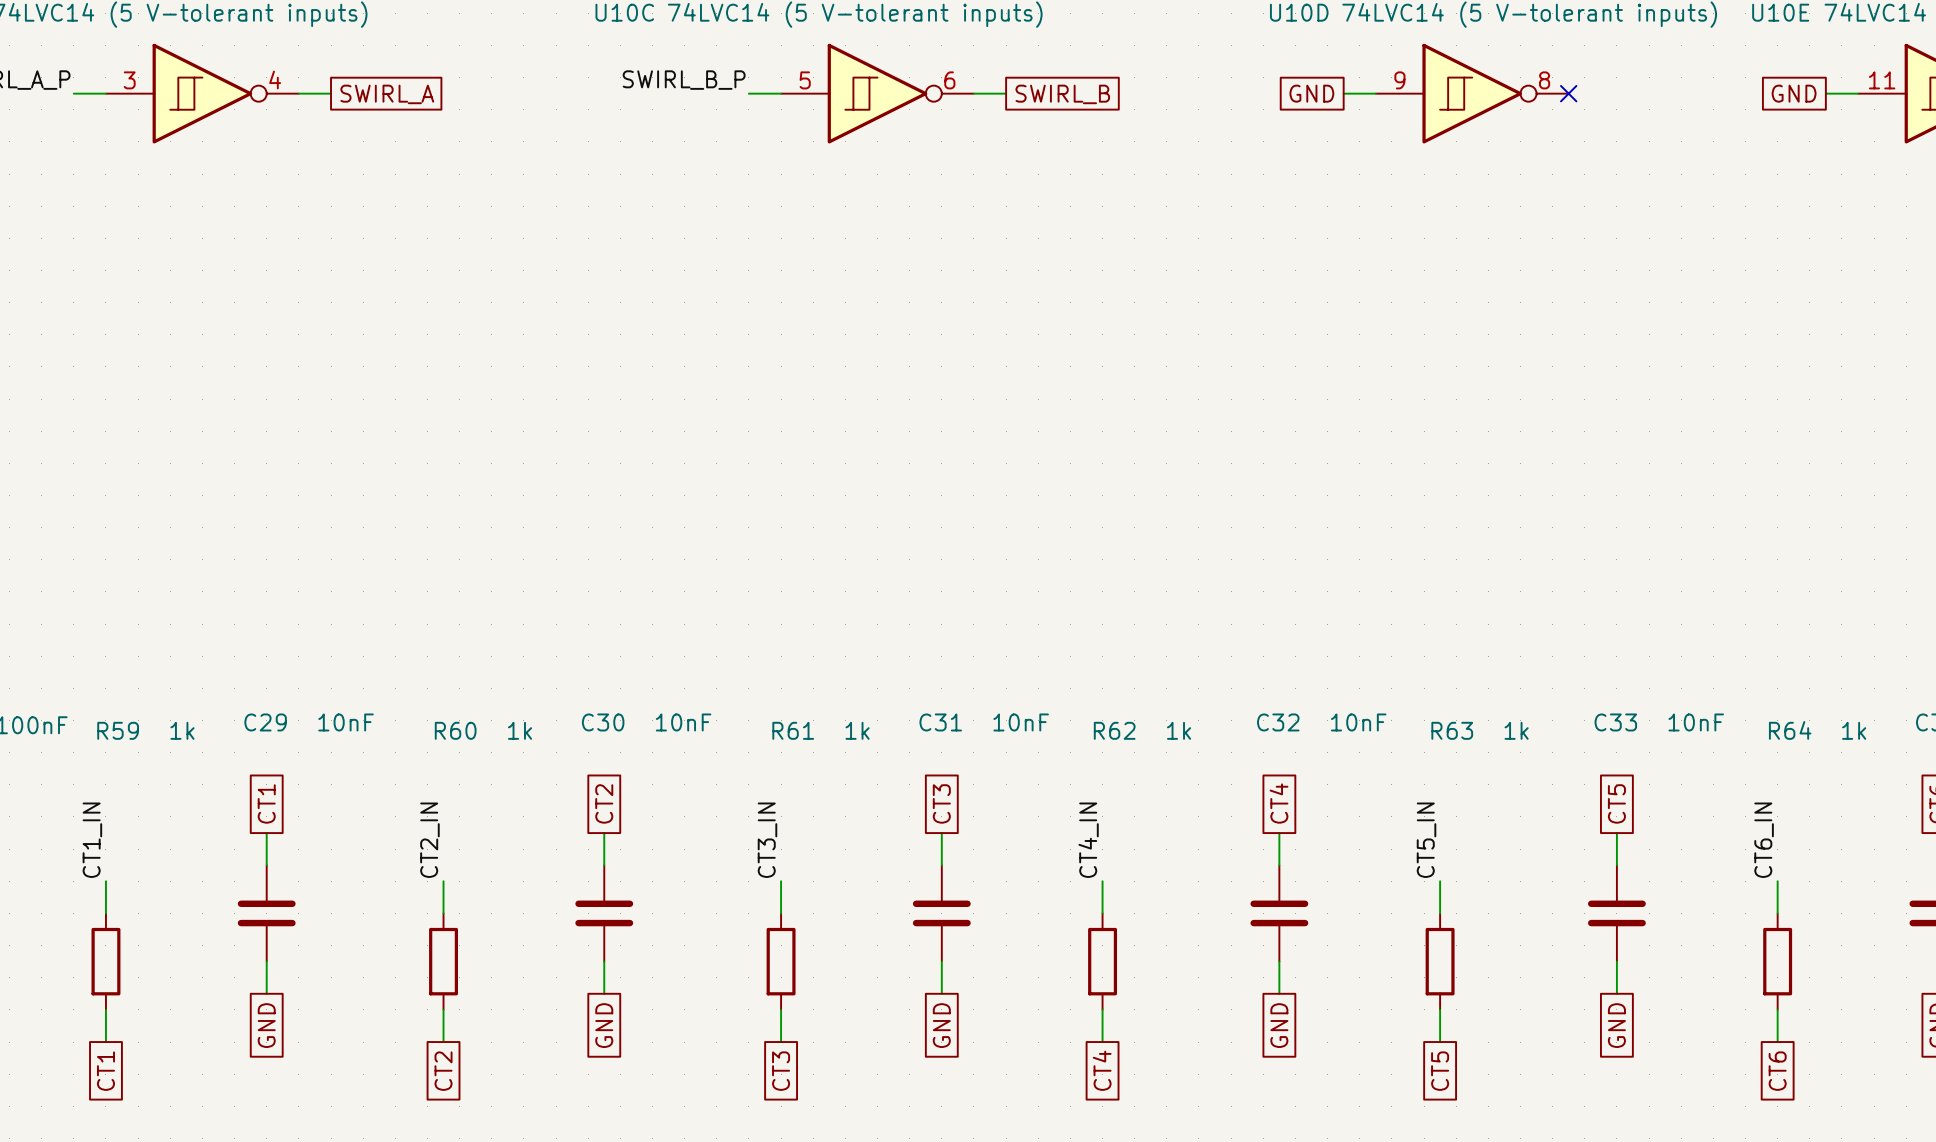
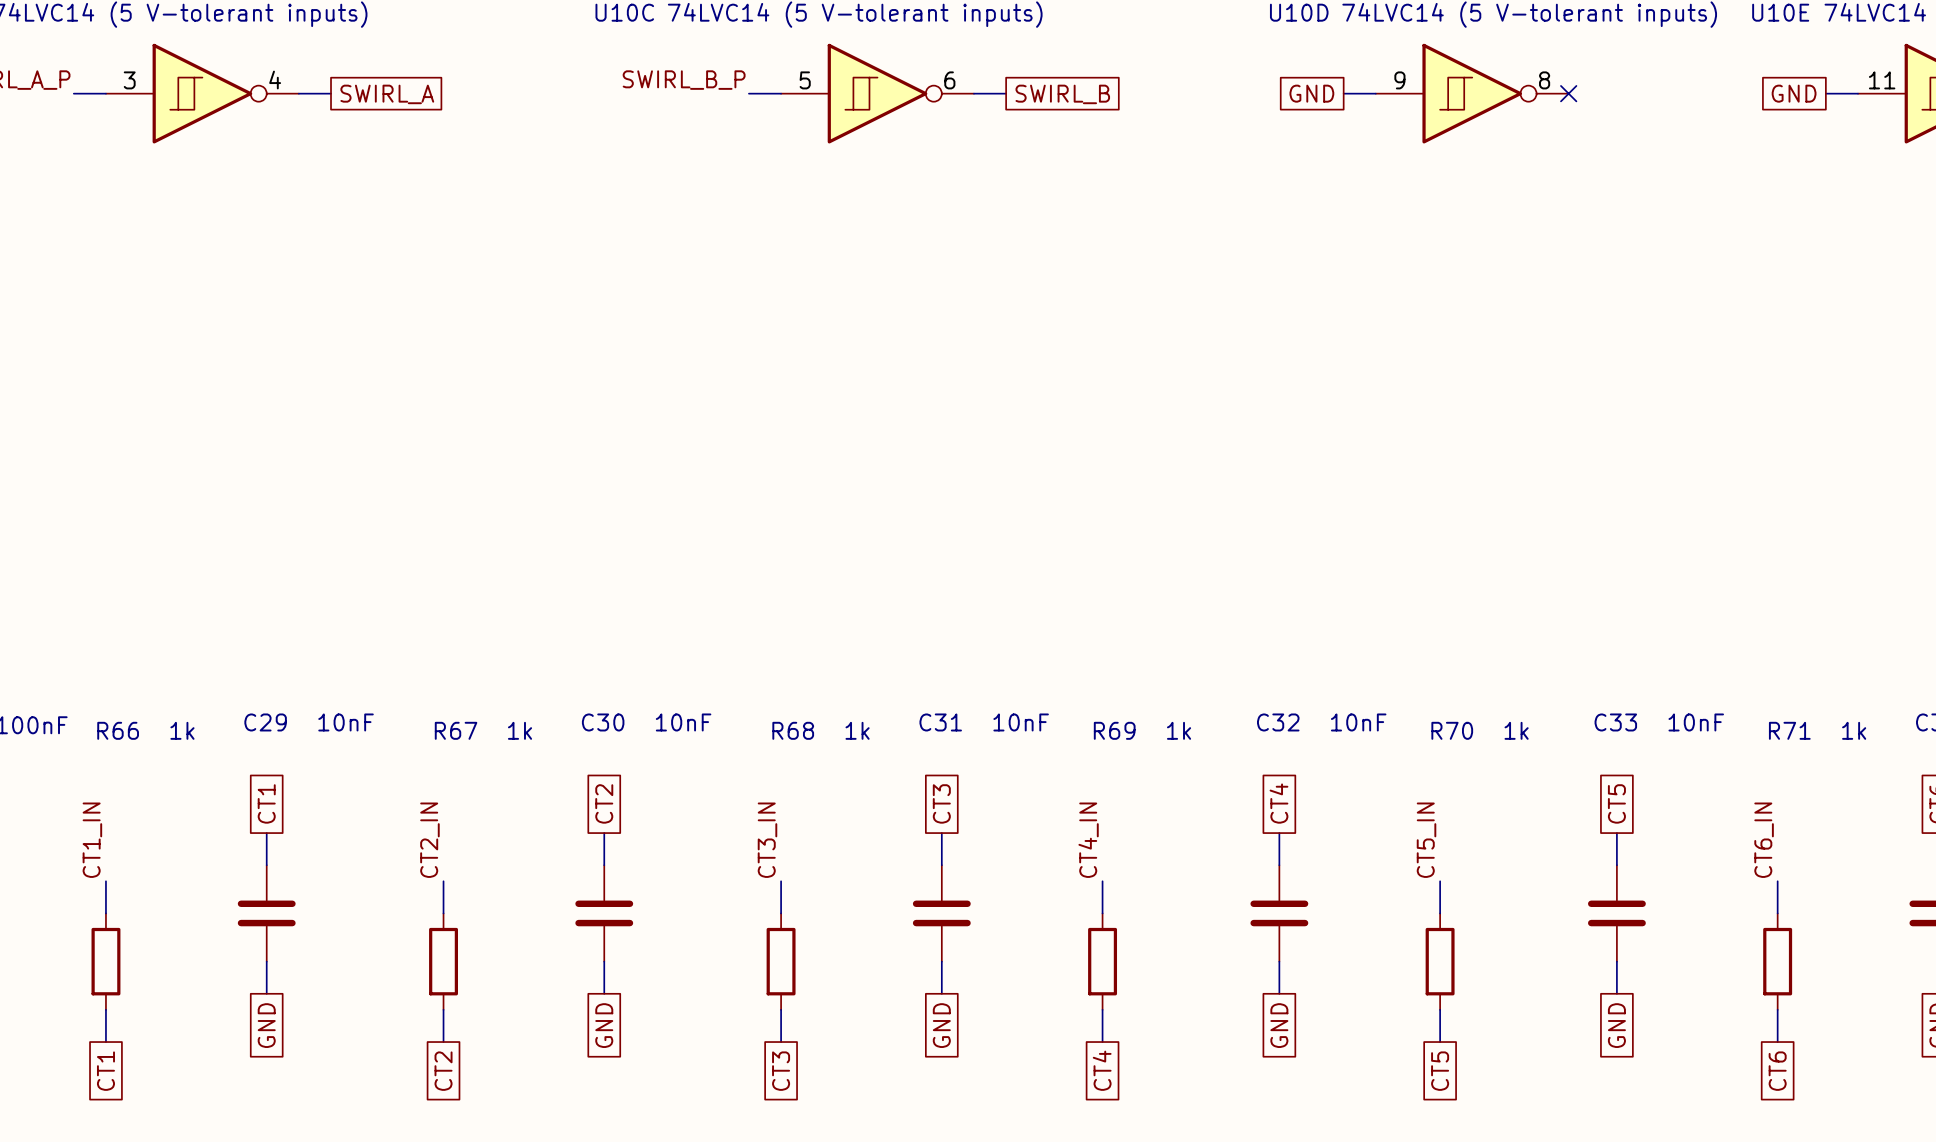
R59 name: R59 (118, 730) -> R66 (118, 730)
R60 name: R60 (455, 730) -> R67 (456, 730)
R61 name: R61 (793, 730) -> R68 (793, 730)
R62 name: R62 (1114, 730) -> R69 (1114, 730)
R63 name: R63 (1452, 730) -> R70 (1452, 730)
R64 name: R64 (1790, 730) -> R71 (1789, 730)

